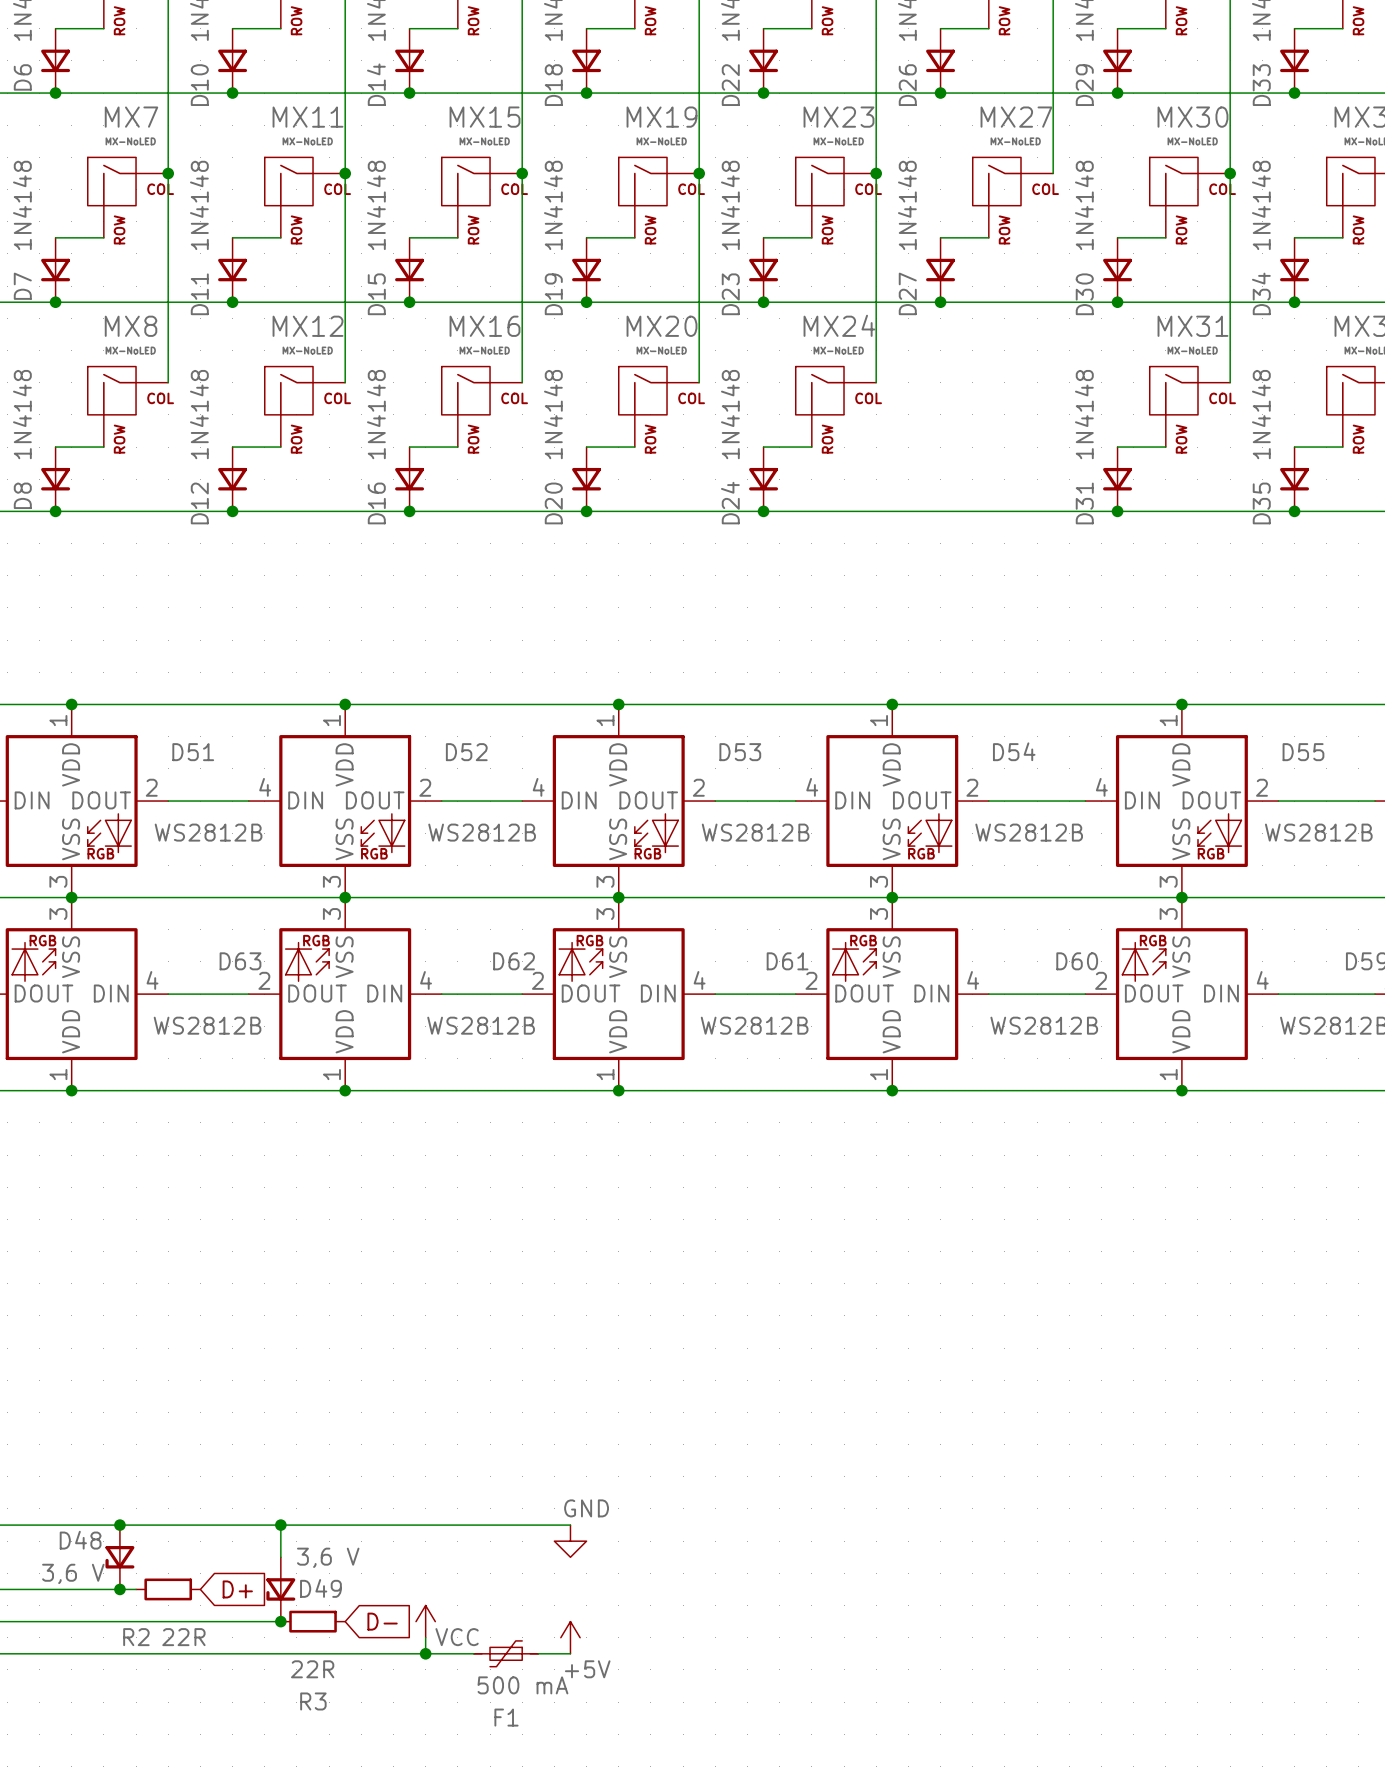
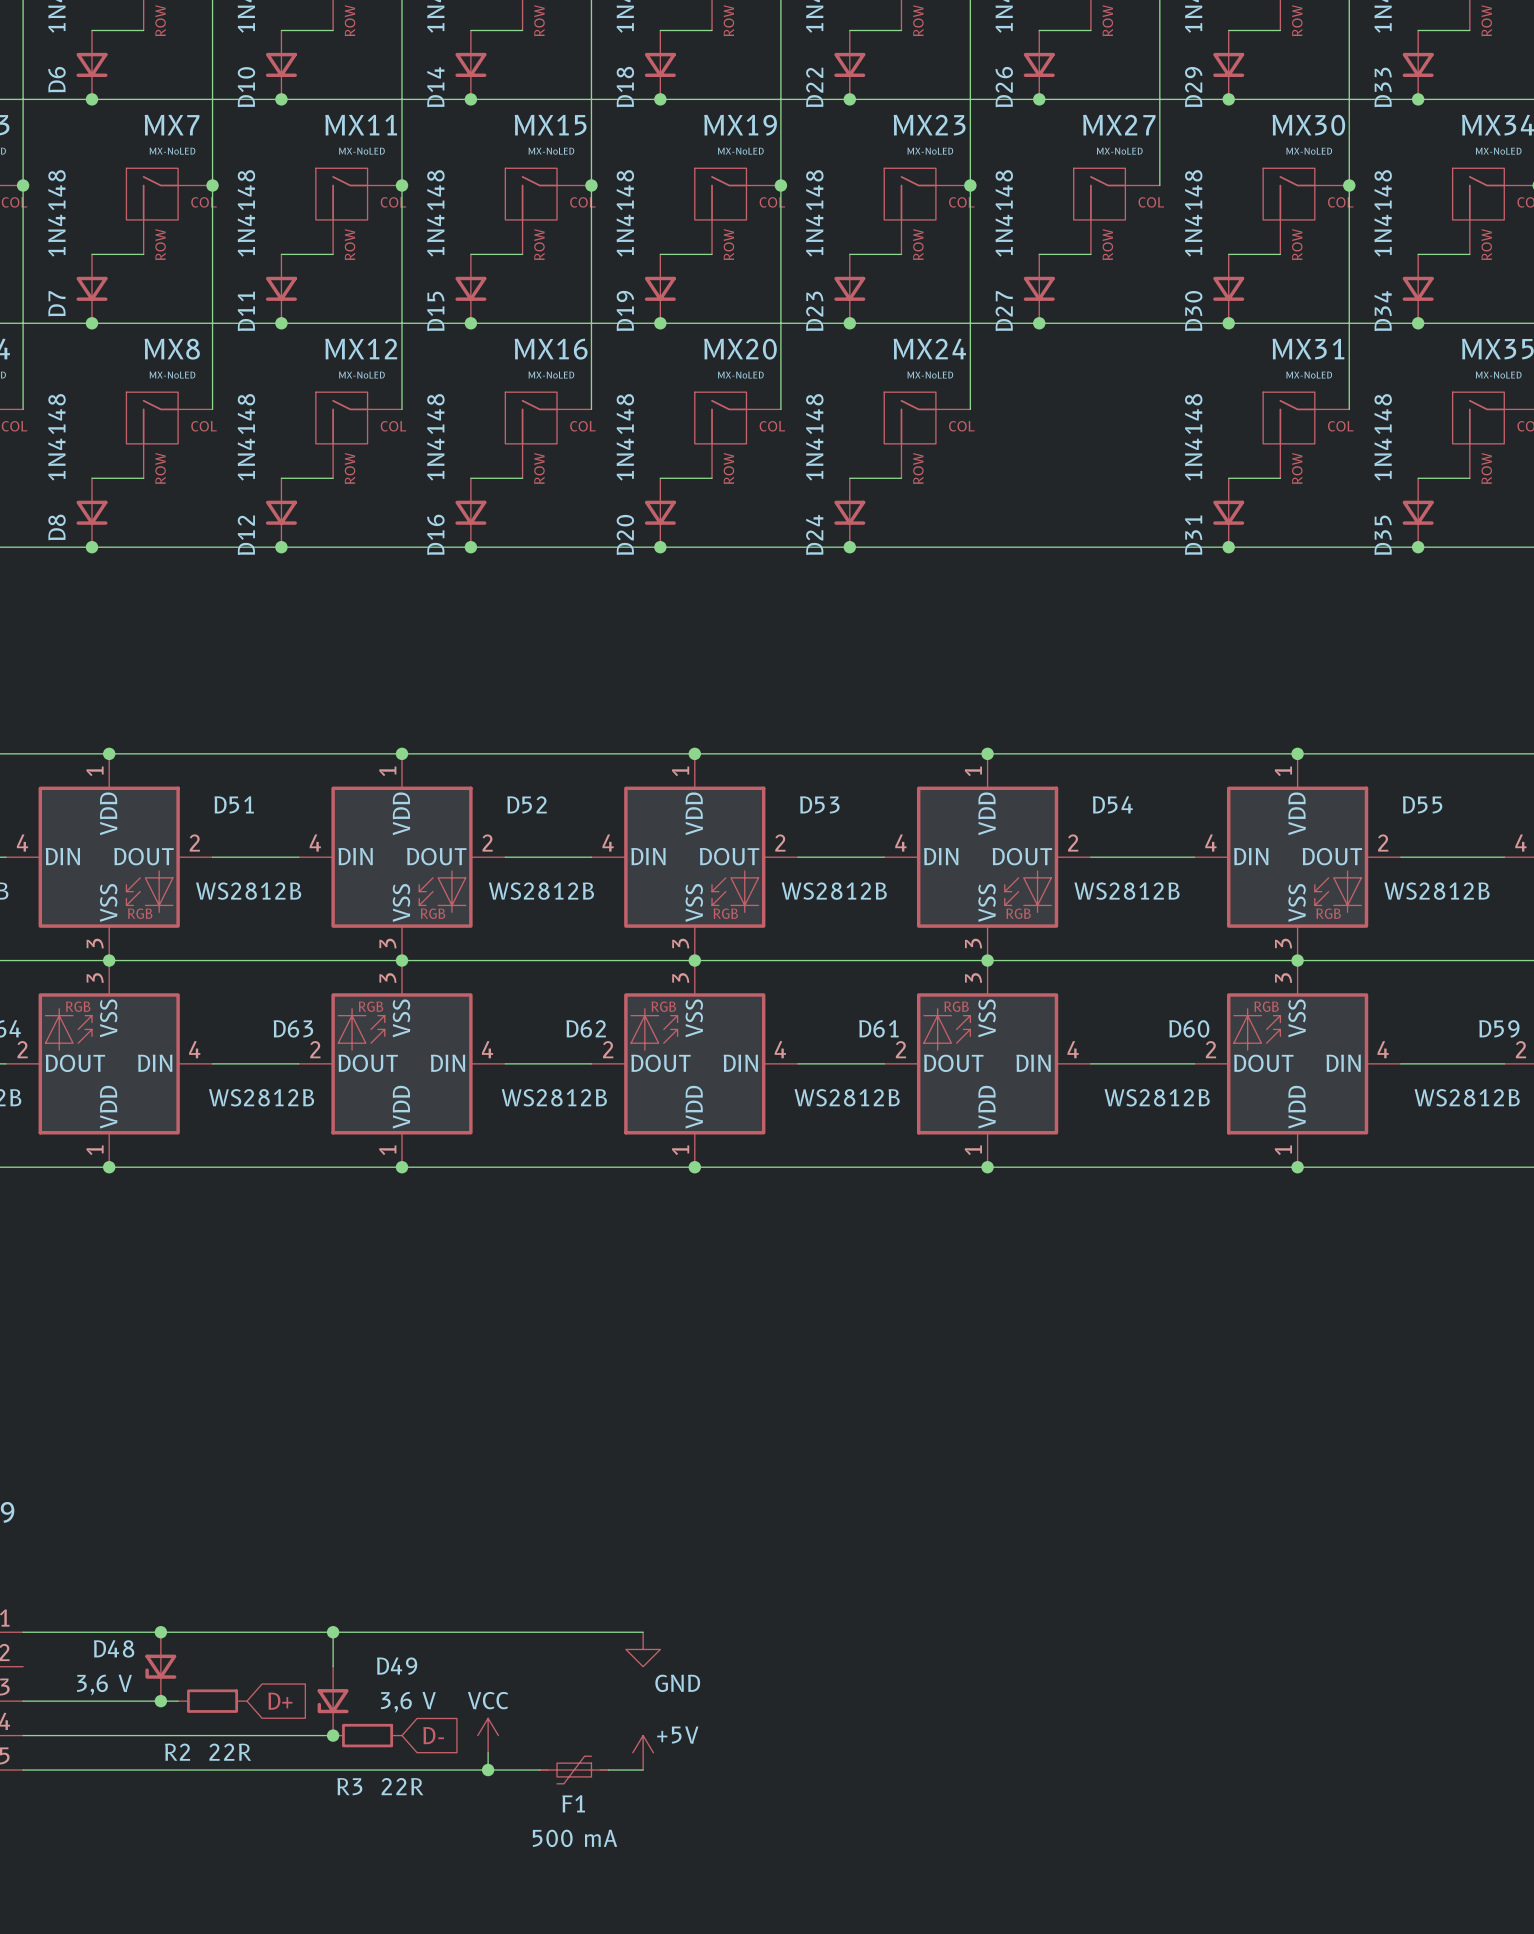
power symbol text position: GND (586, 1508) -> GND (677, 1683)
D49 value position: 3,6 V (328, 1557) -> 3,6 V (408, 1702)
D49 name position: D49 (320, 1588) -> D49 (397, 1666)
power symbol text position: VCC (457, 1637) -> VCC (488, 1700)
R3 value position: 22R (312, 1669) -> 22R (402, 1786)
power symbol text position: +5V (587, 1669) -> +5V (677, 1735)
F1 value position: 500 mA (522, 1685) -> 500 mA (574, 1838)
R3 name position: R3 (313, 1701) -> R3 (349, 1786)
F1 name position: F1 (506, 1717) -> F1 (573, 1803)

